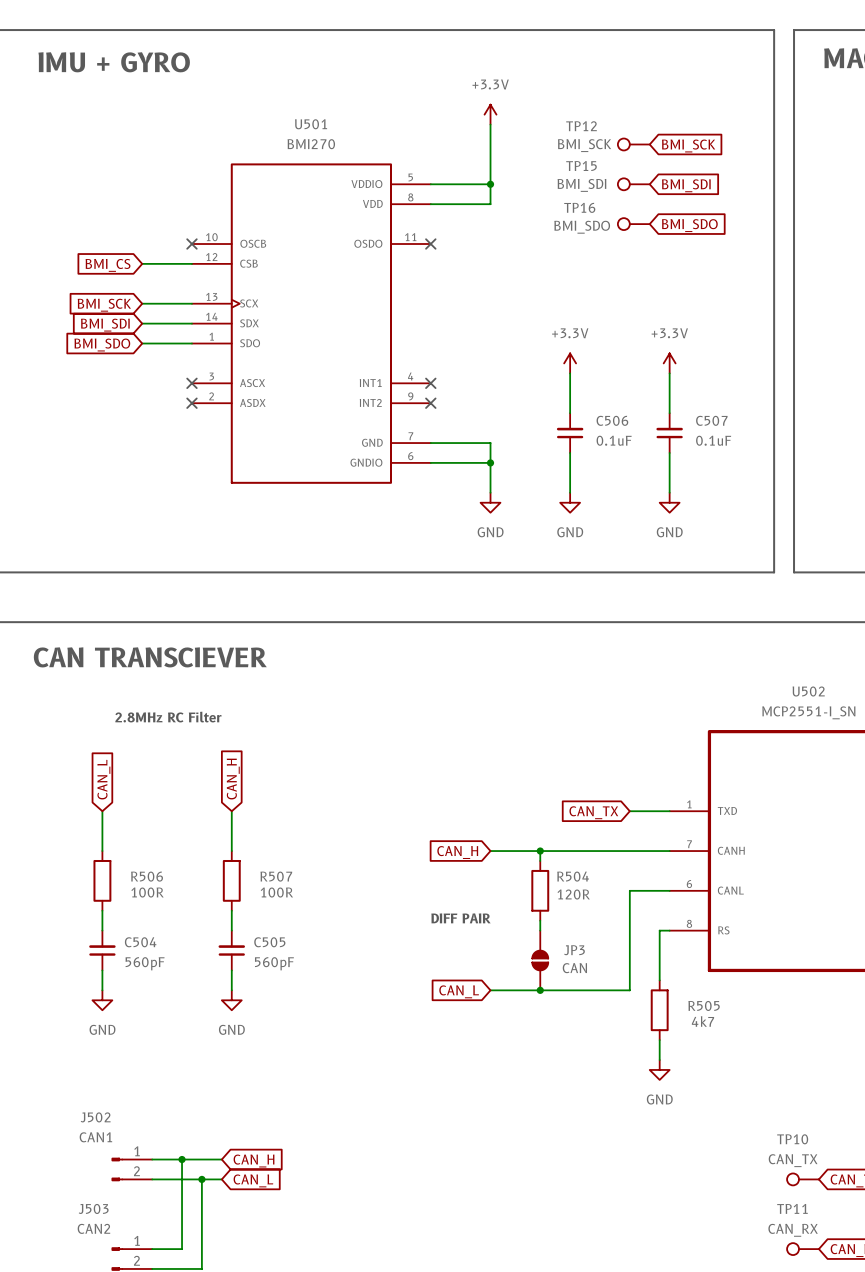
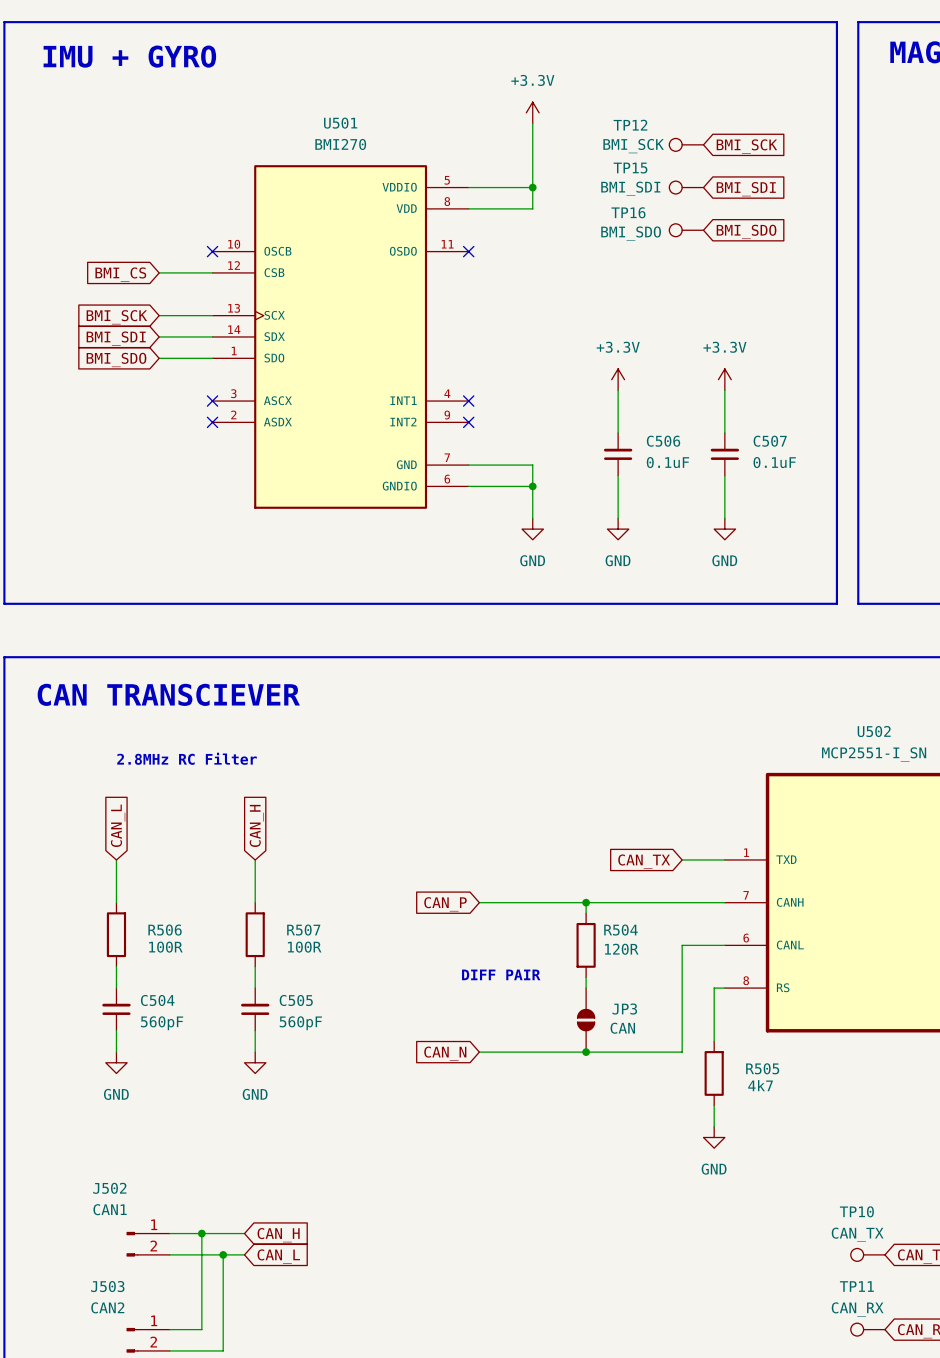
wire: none -> (479, 902) (532, 902)
global label: CAN_H (457, 852) -> CAN_P (445, 904)
wire: none -> (479, 1052) (532, 1052)
global label: CAN_L (459, 991) -> CAN_N (445, 1053)

